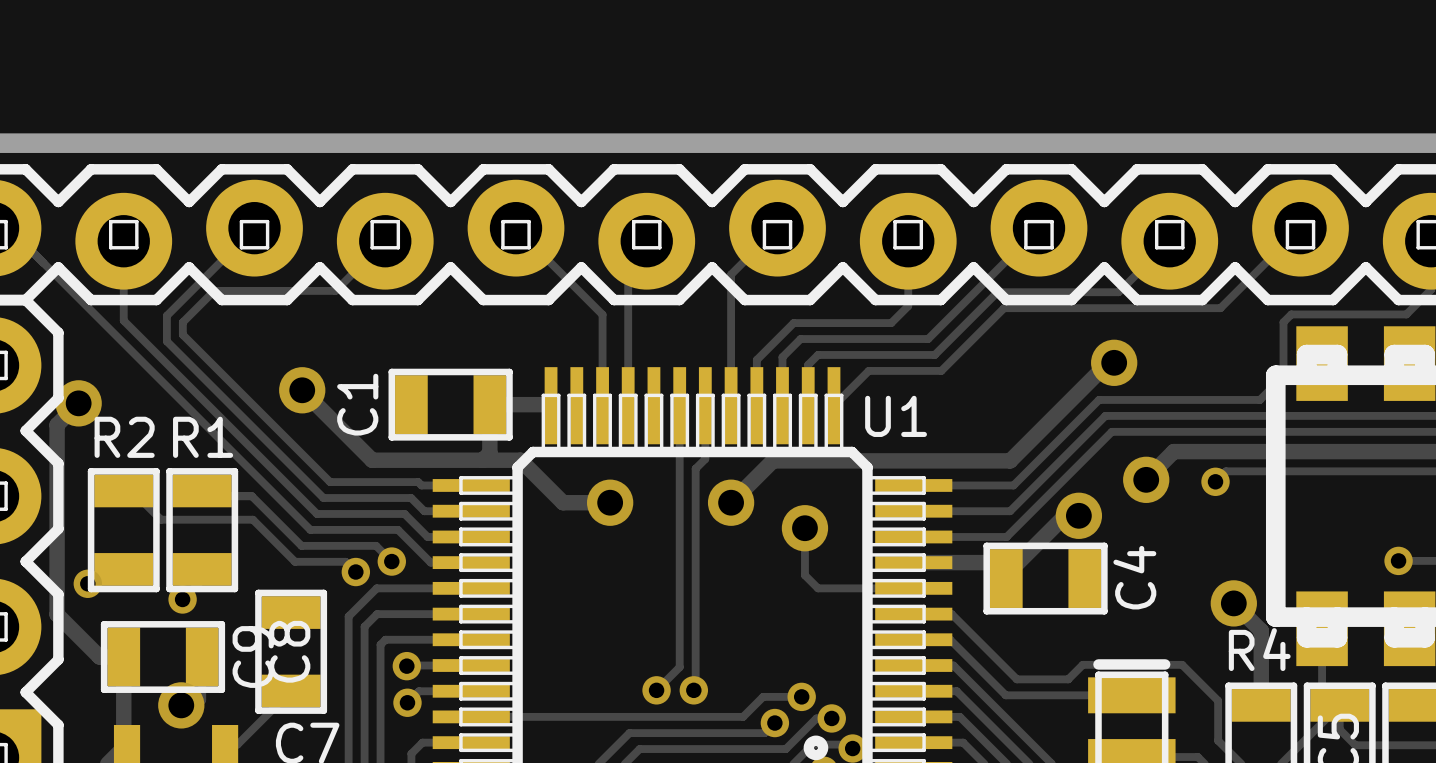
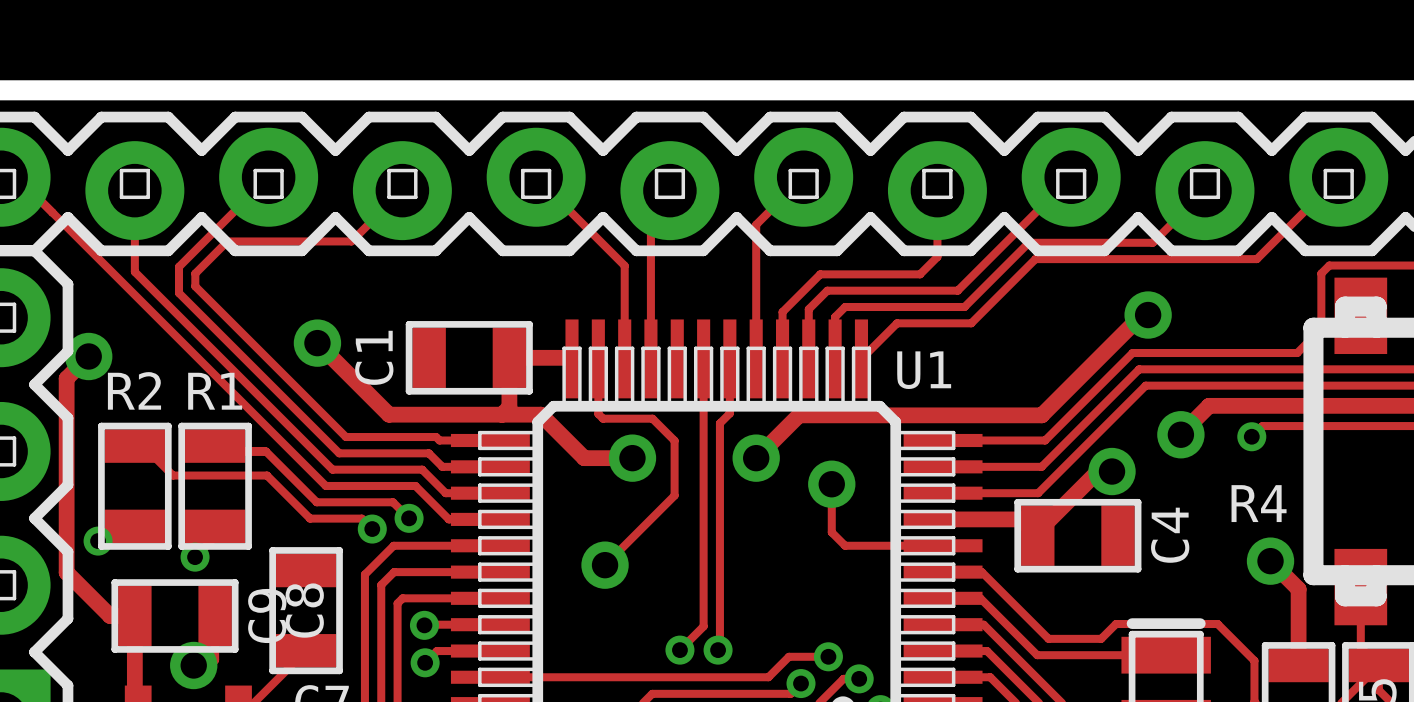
track: none -> (598, 358) (598, 414) (603, 418) (652, 418) (674, 440) (674, 495) (605, 565)
via: none -> (605, 565)
R4 name position: R4 (1259, 649) -> R4 (1259, 503)

